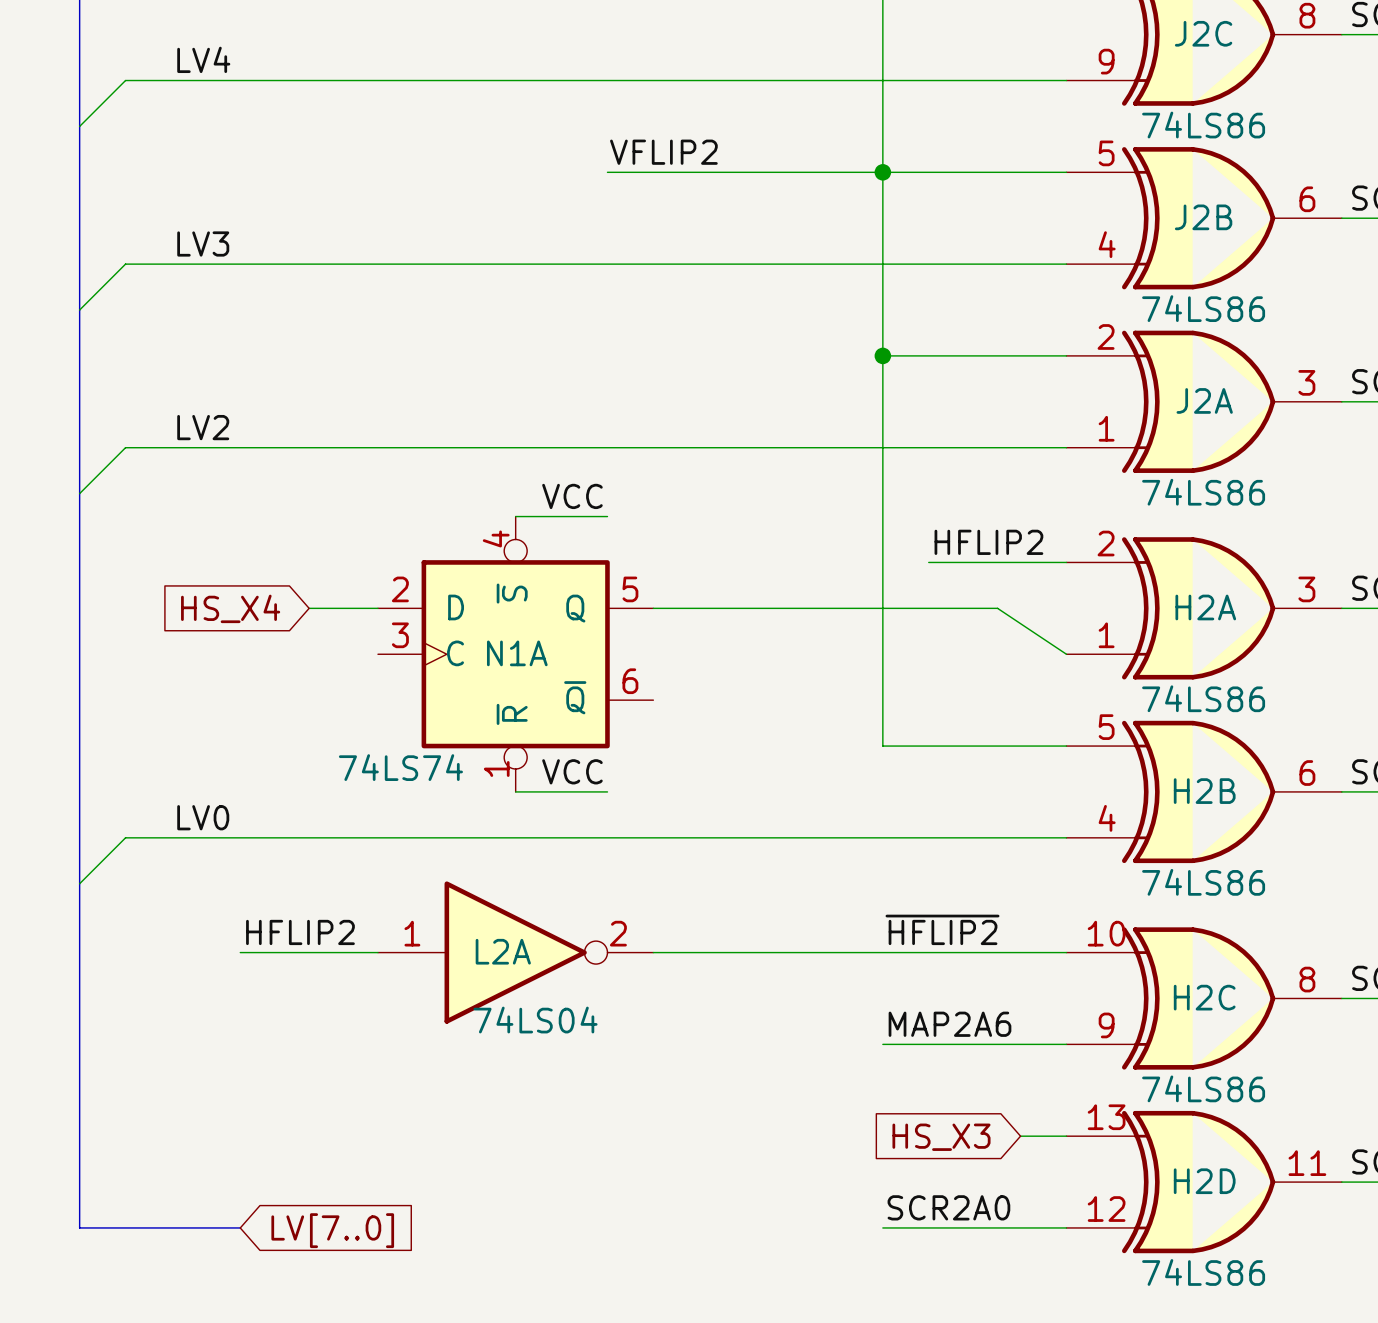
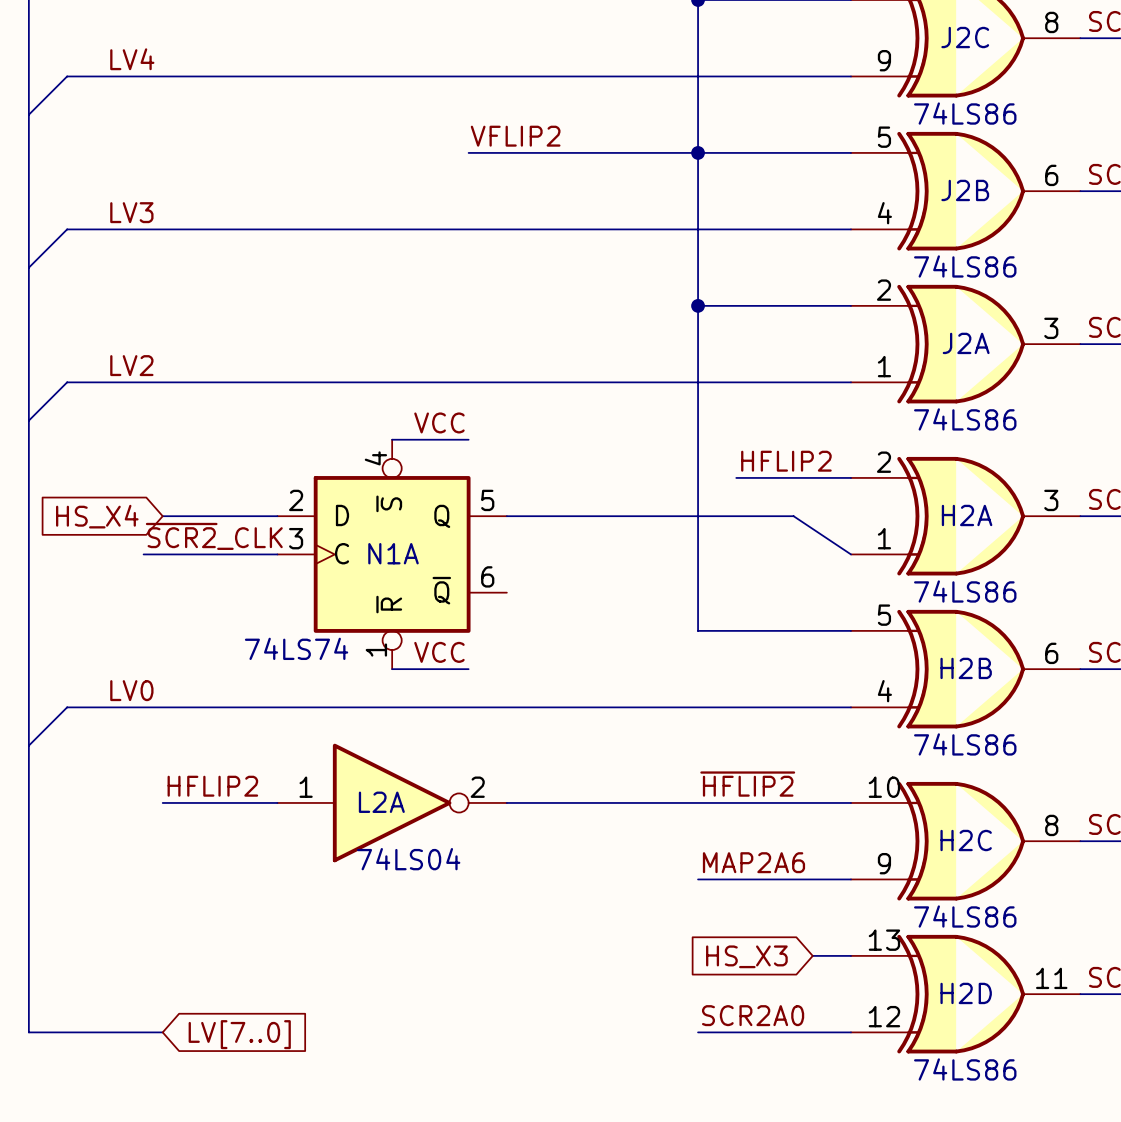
global label position: HS_X4 (230, 608) -> HS_X4 (97, 516)
wire: none -> (162, 516) (220, 516)
label: none -> ~{SCR2}_CLK (214, 536)
wire: none -> (143, 554) (277, 554)

